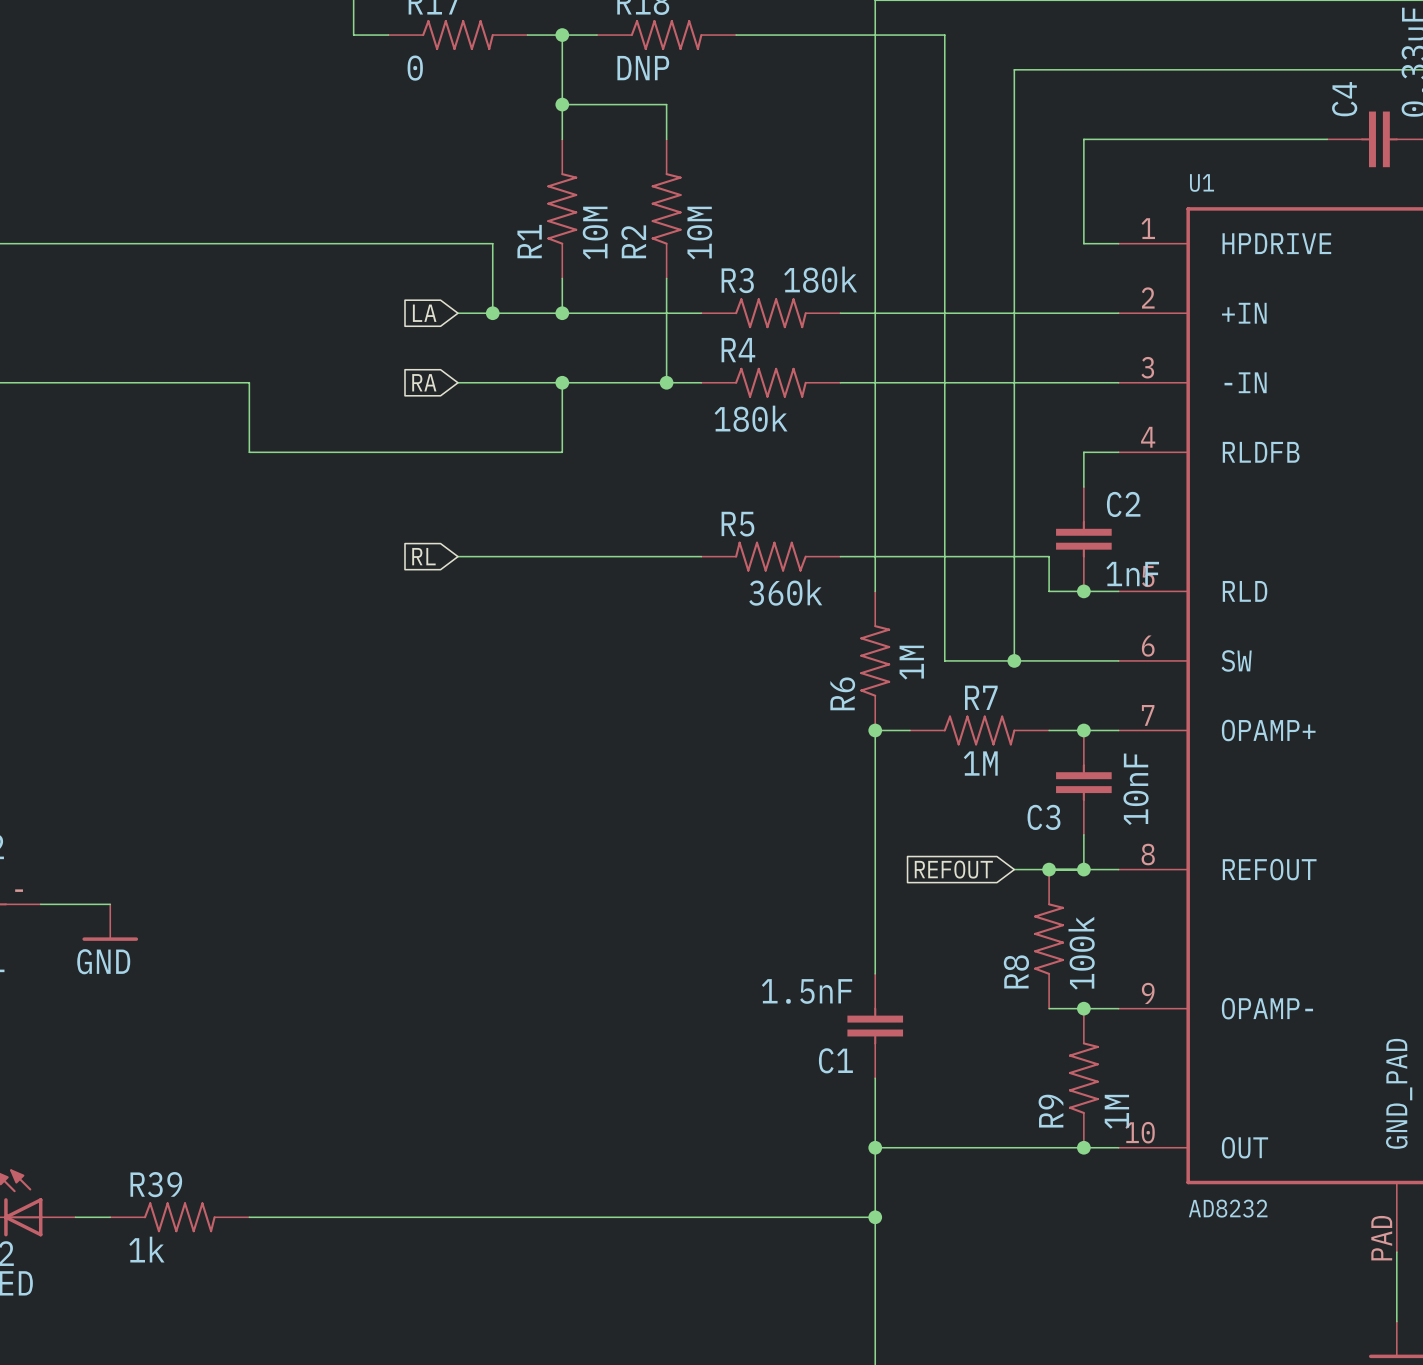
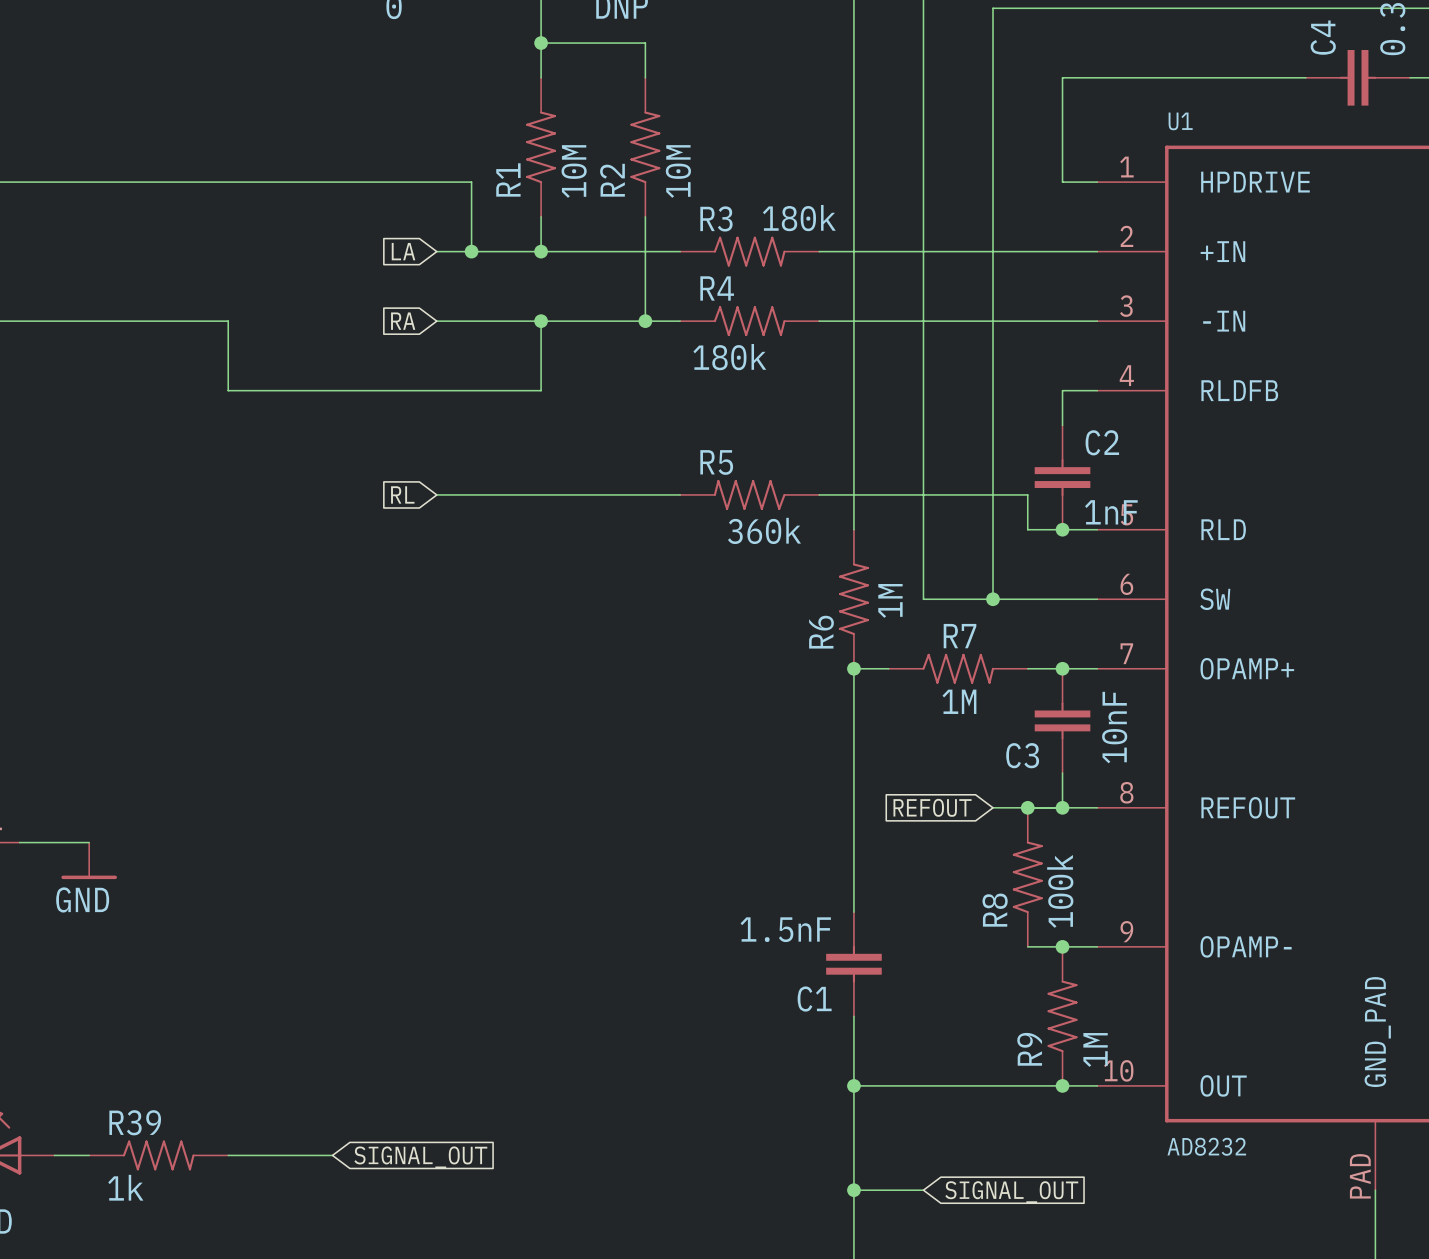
wire: (353, 1217) (875, 1217) -> none
junction position: (875, 1217) -> (853, 1190)
global label: none -> SIGNAL_OUT (420, 1157)
wire: none -> (853, 1190) (923, 1190)
global label: none -> SIGNAL_OUT (1011, 1192)

